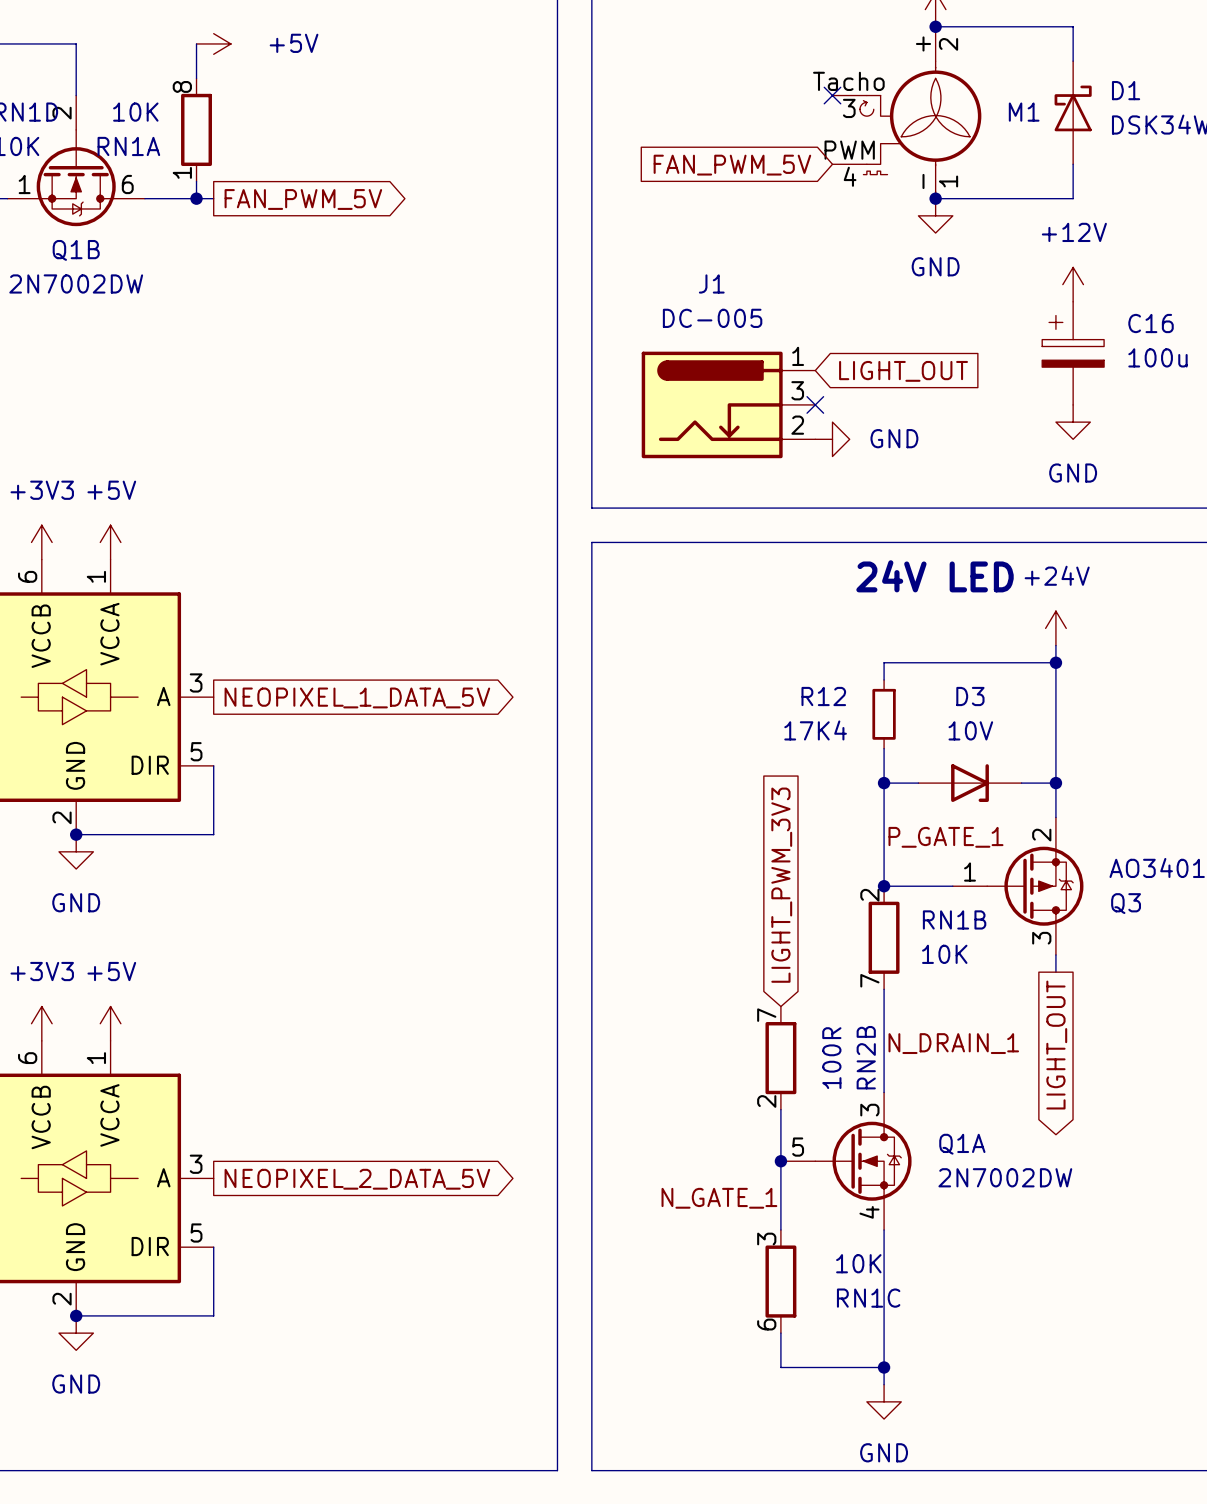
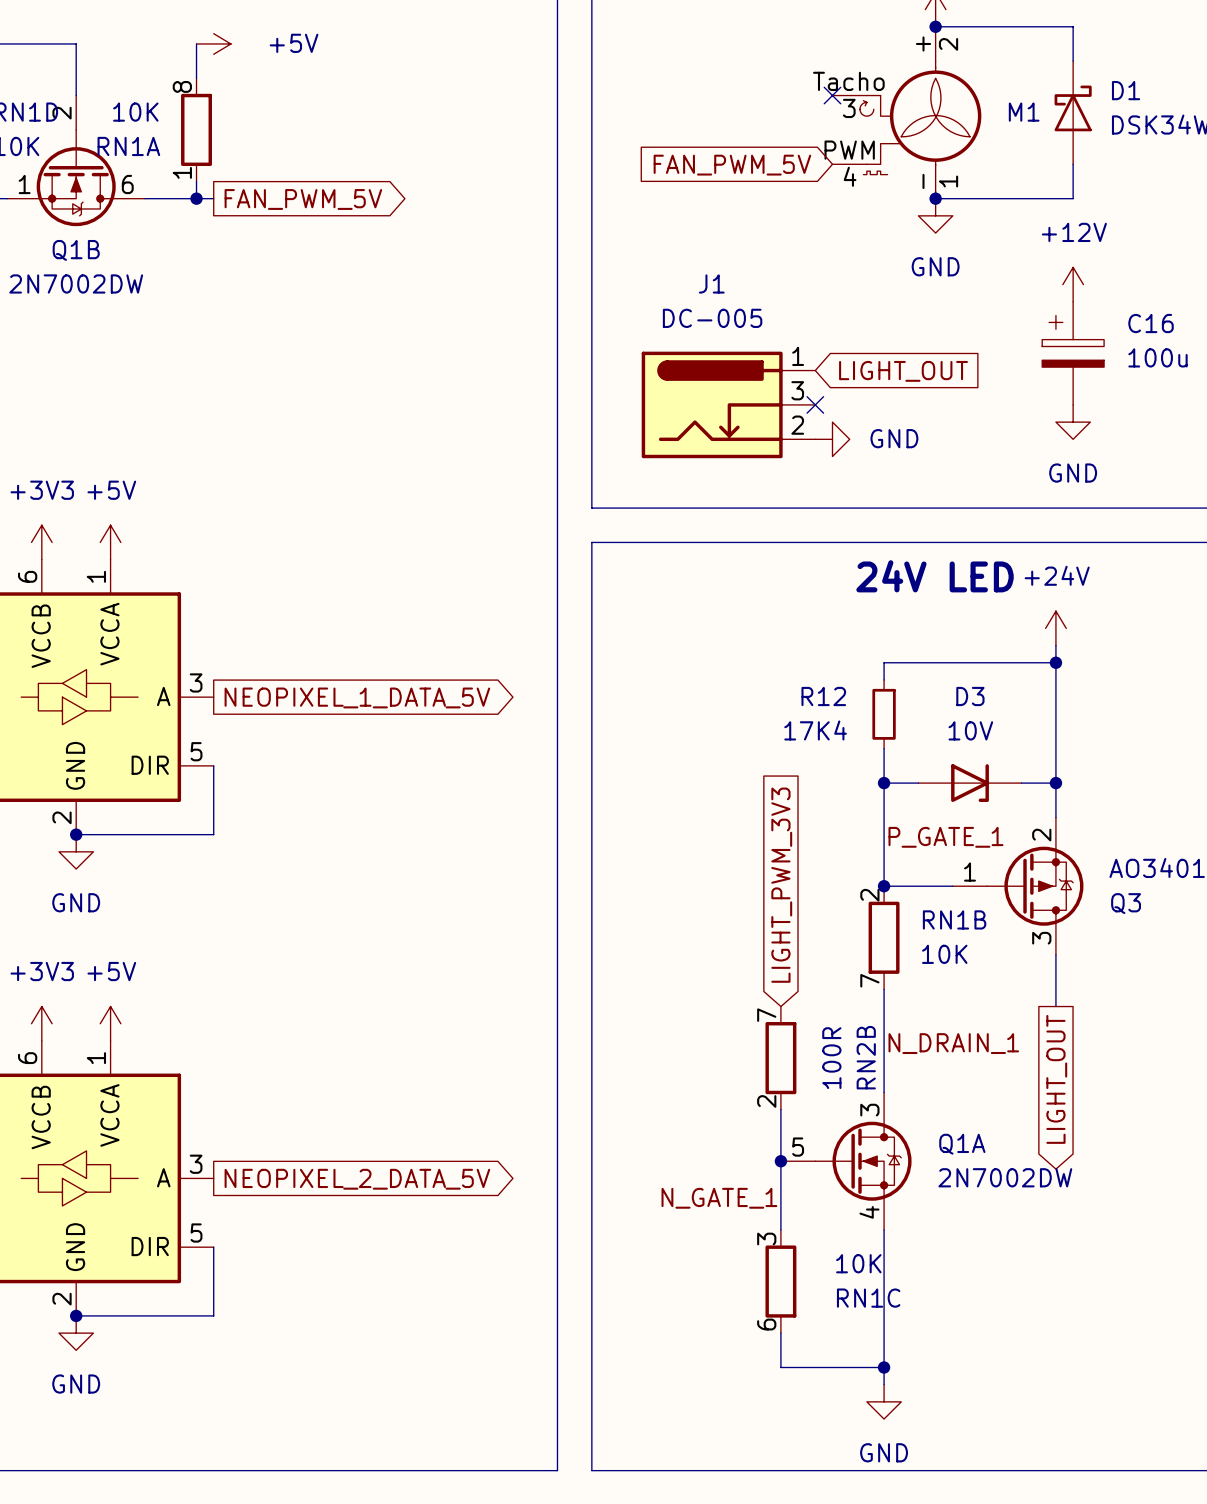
wire: none -> (1055, 972) (1055, 1006)
global label position: LIGHT_OUT (1056, 1045) -> LIGHT_OUT (1056, 1079)

